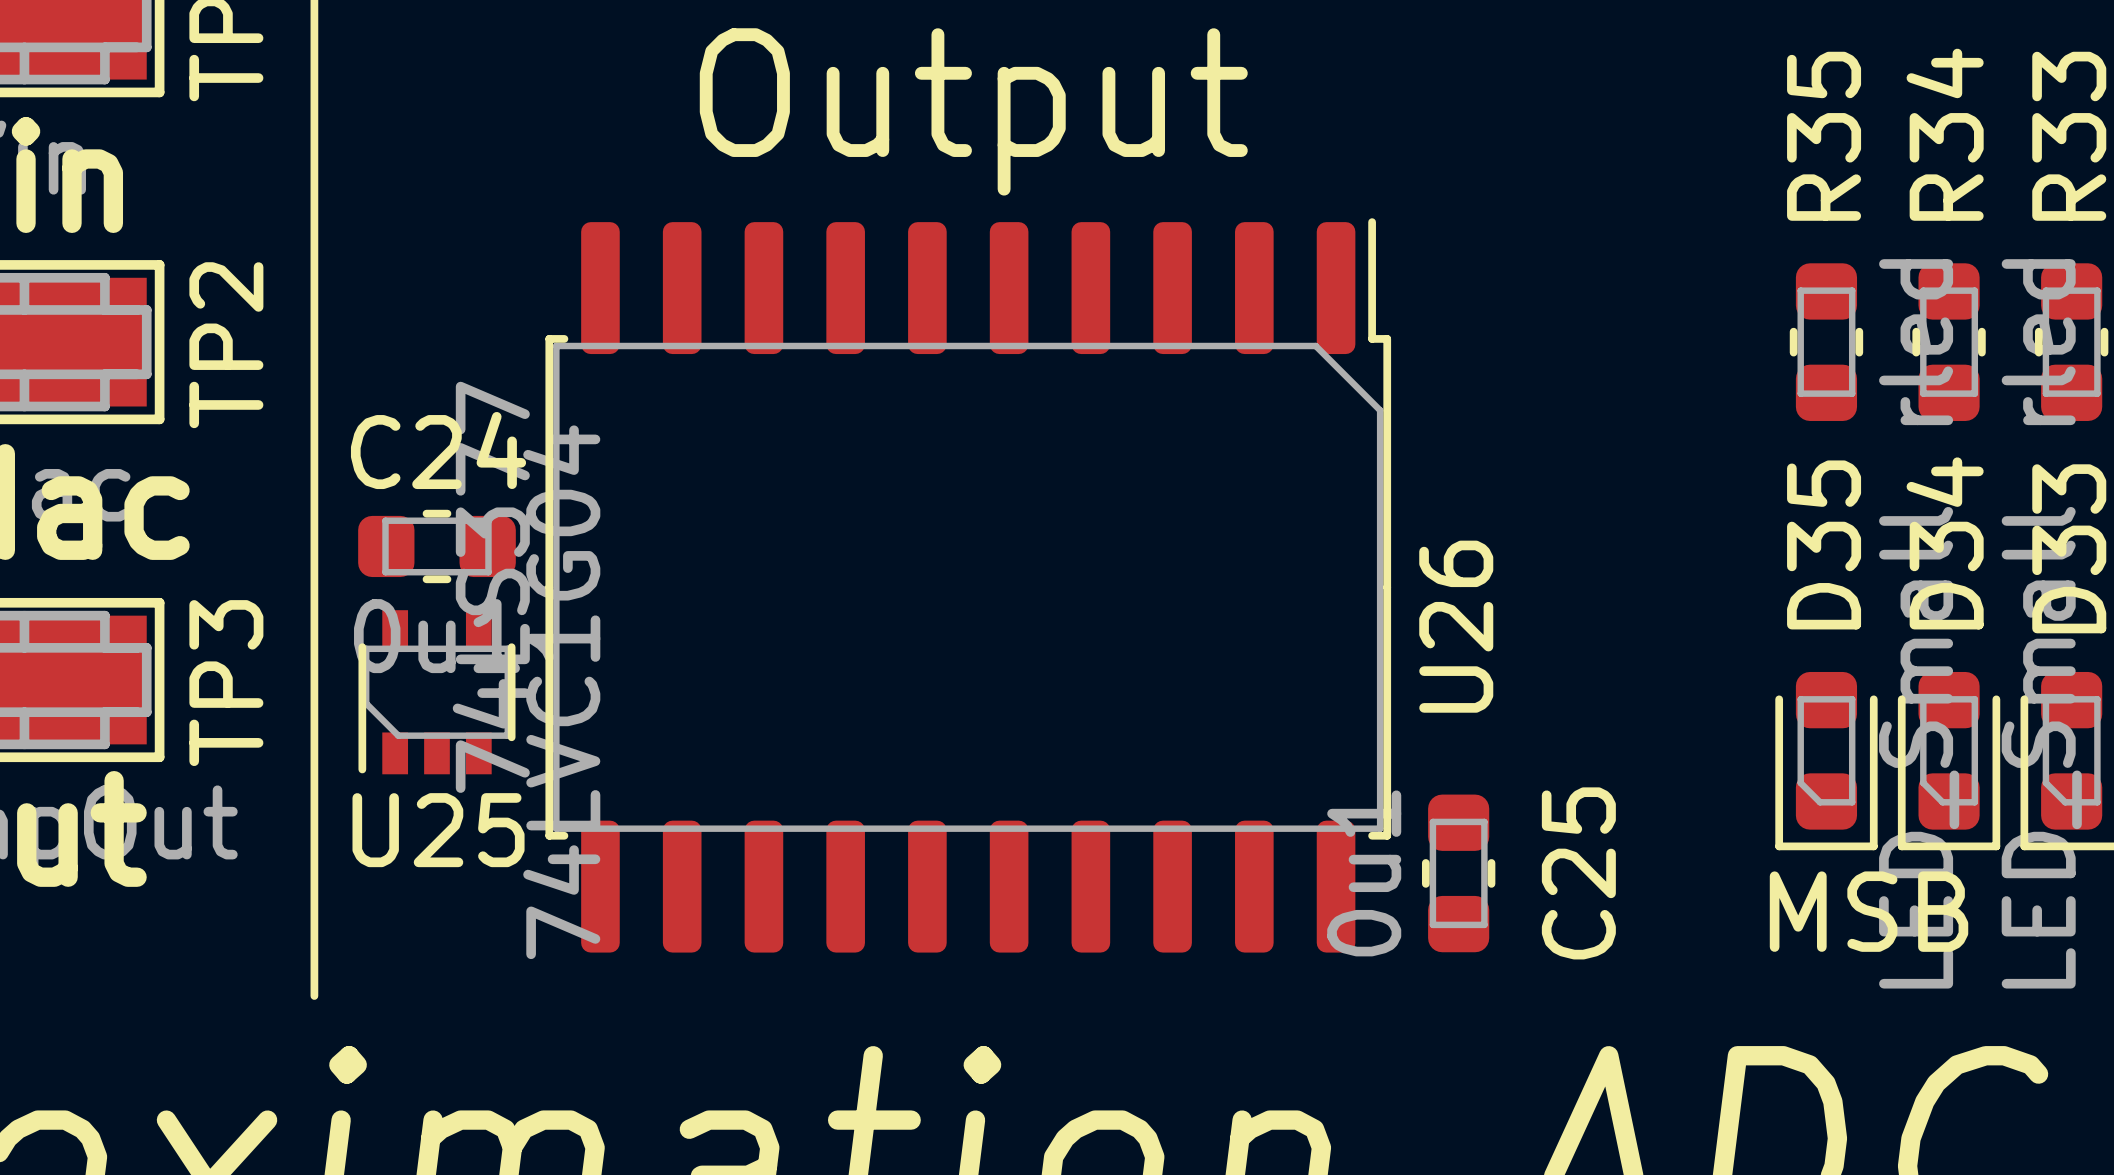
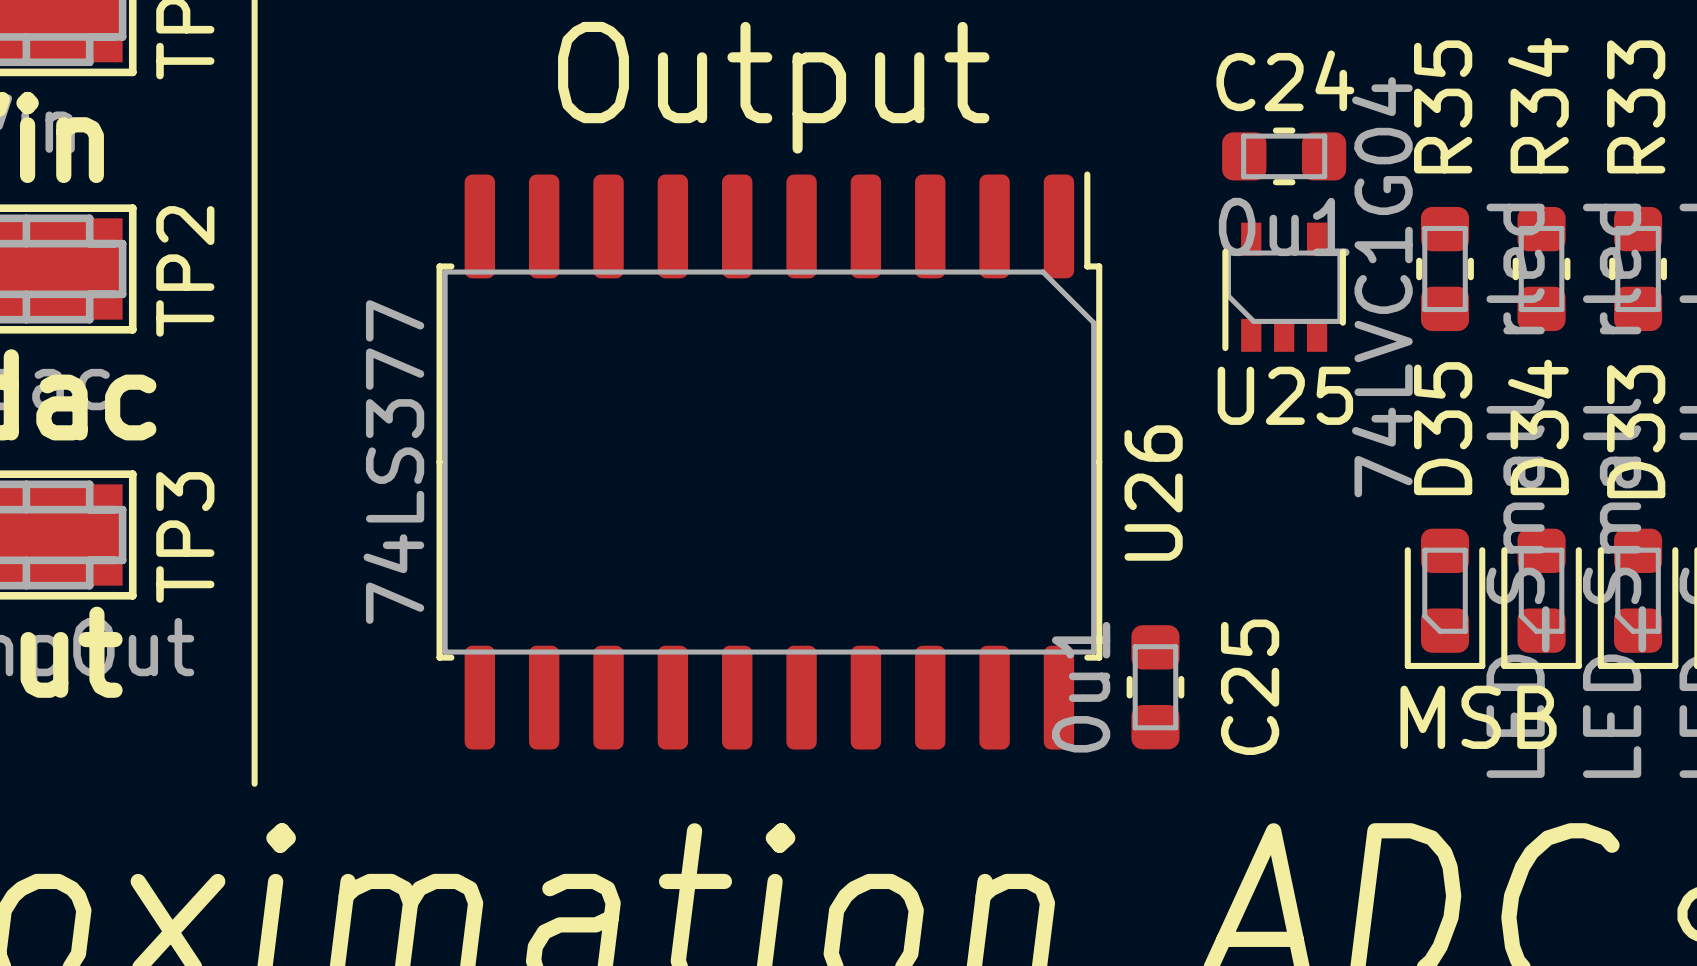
C24 position: (436, 546) -> (1284, 156)
U25 position: (436, 692) -> (1284, 287)

